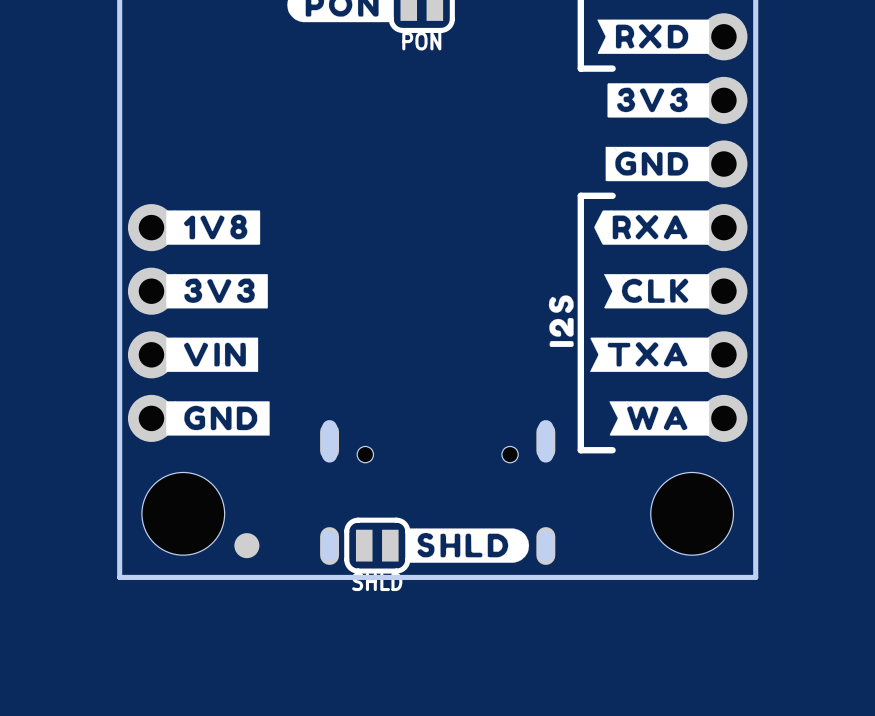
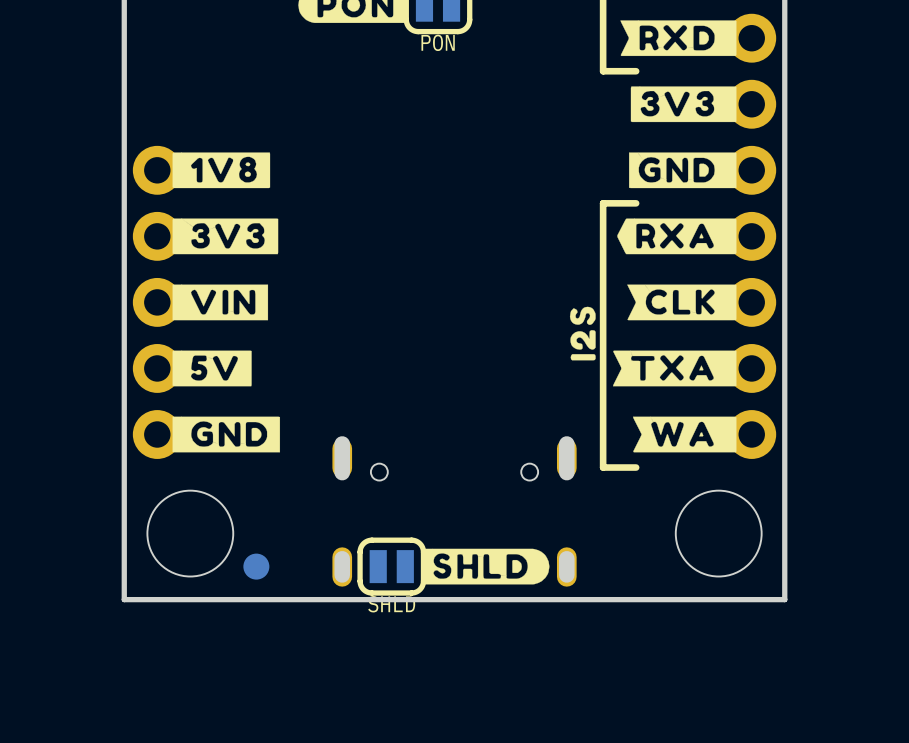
drawing position: (213, 227) -> (221, 170)
part: none -> (157, 302)
drawing position: (217, 291) -> (225, 236)
drawing: none -> [172, 350, 252, 387]
drawing position: (212, 354) -> (220, 302)

